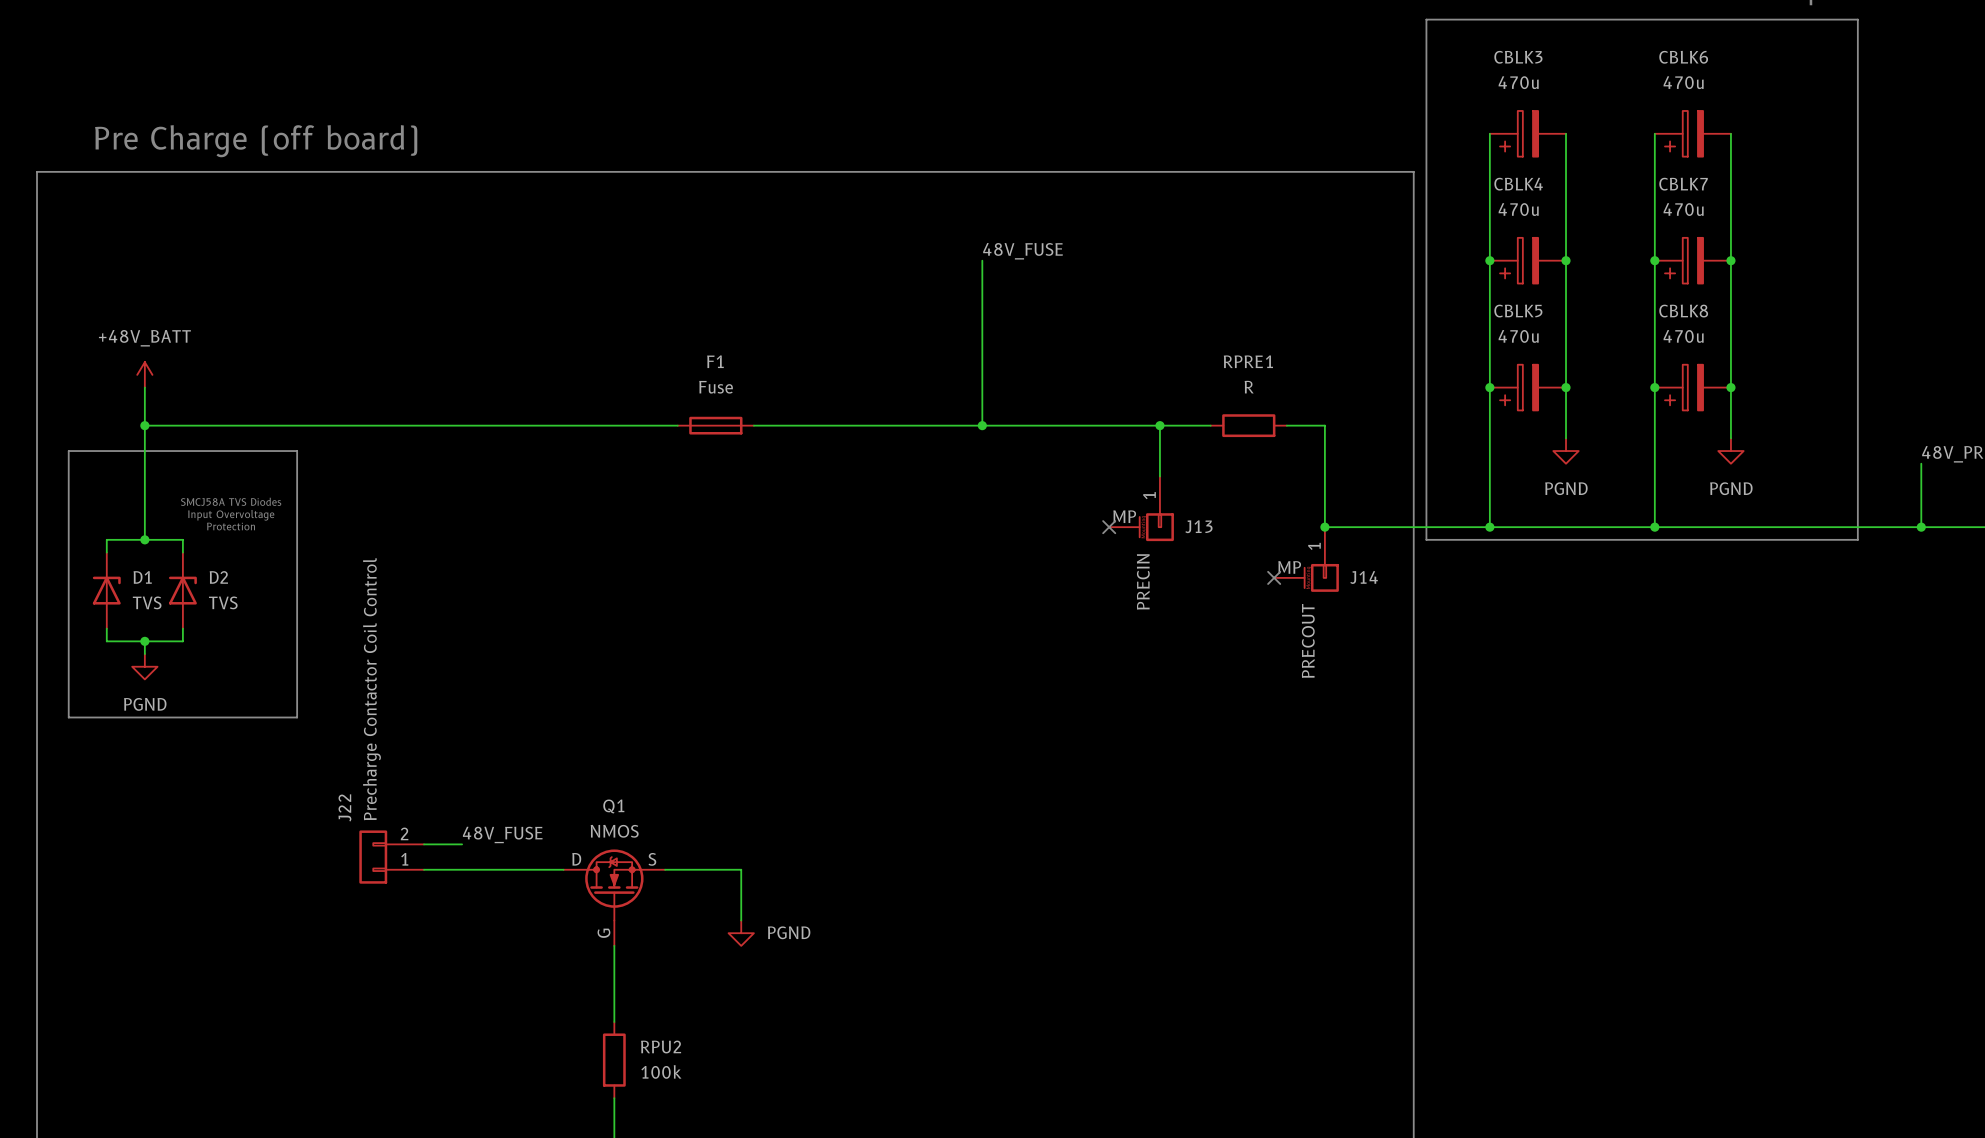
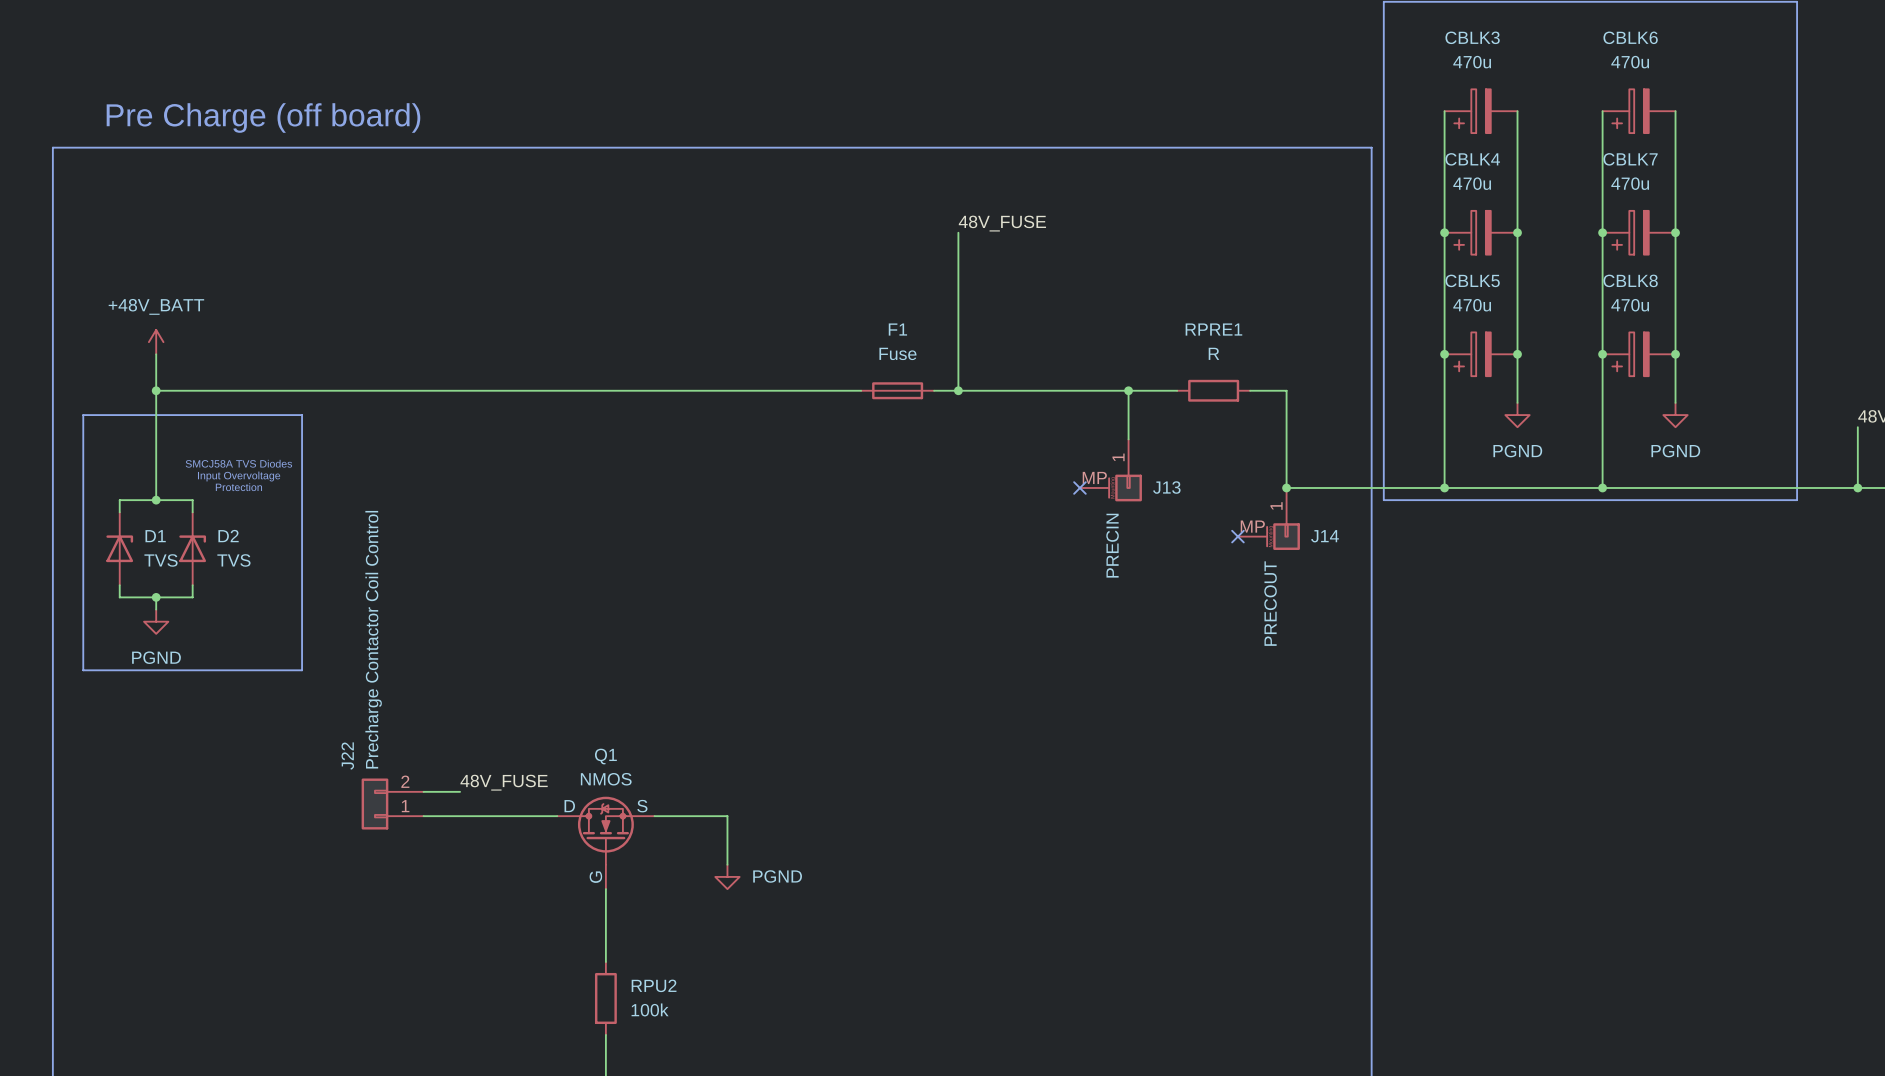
F1 position: (715, 425) -> (897, 390)

